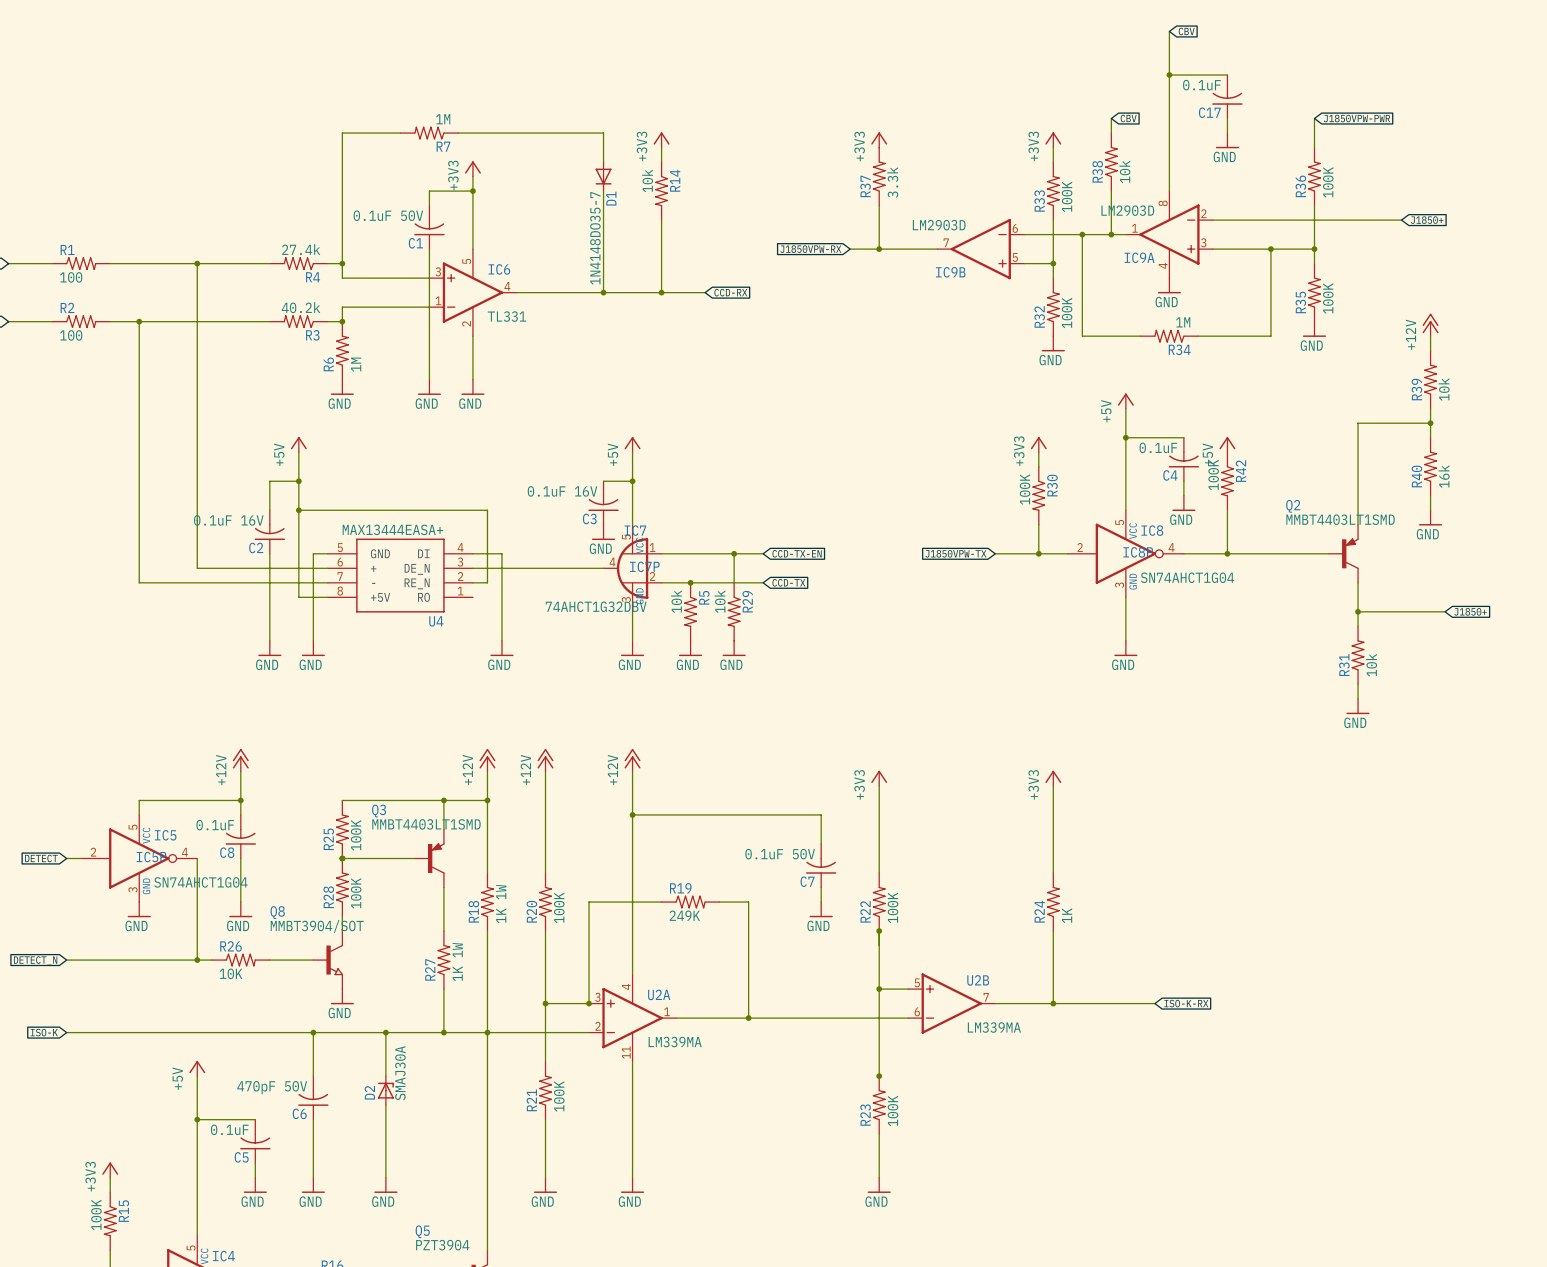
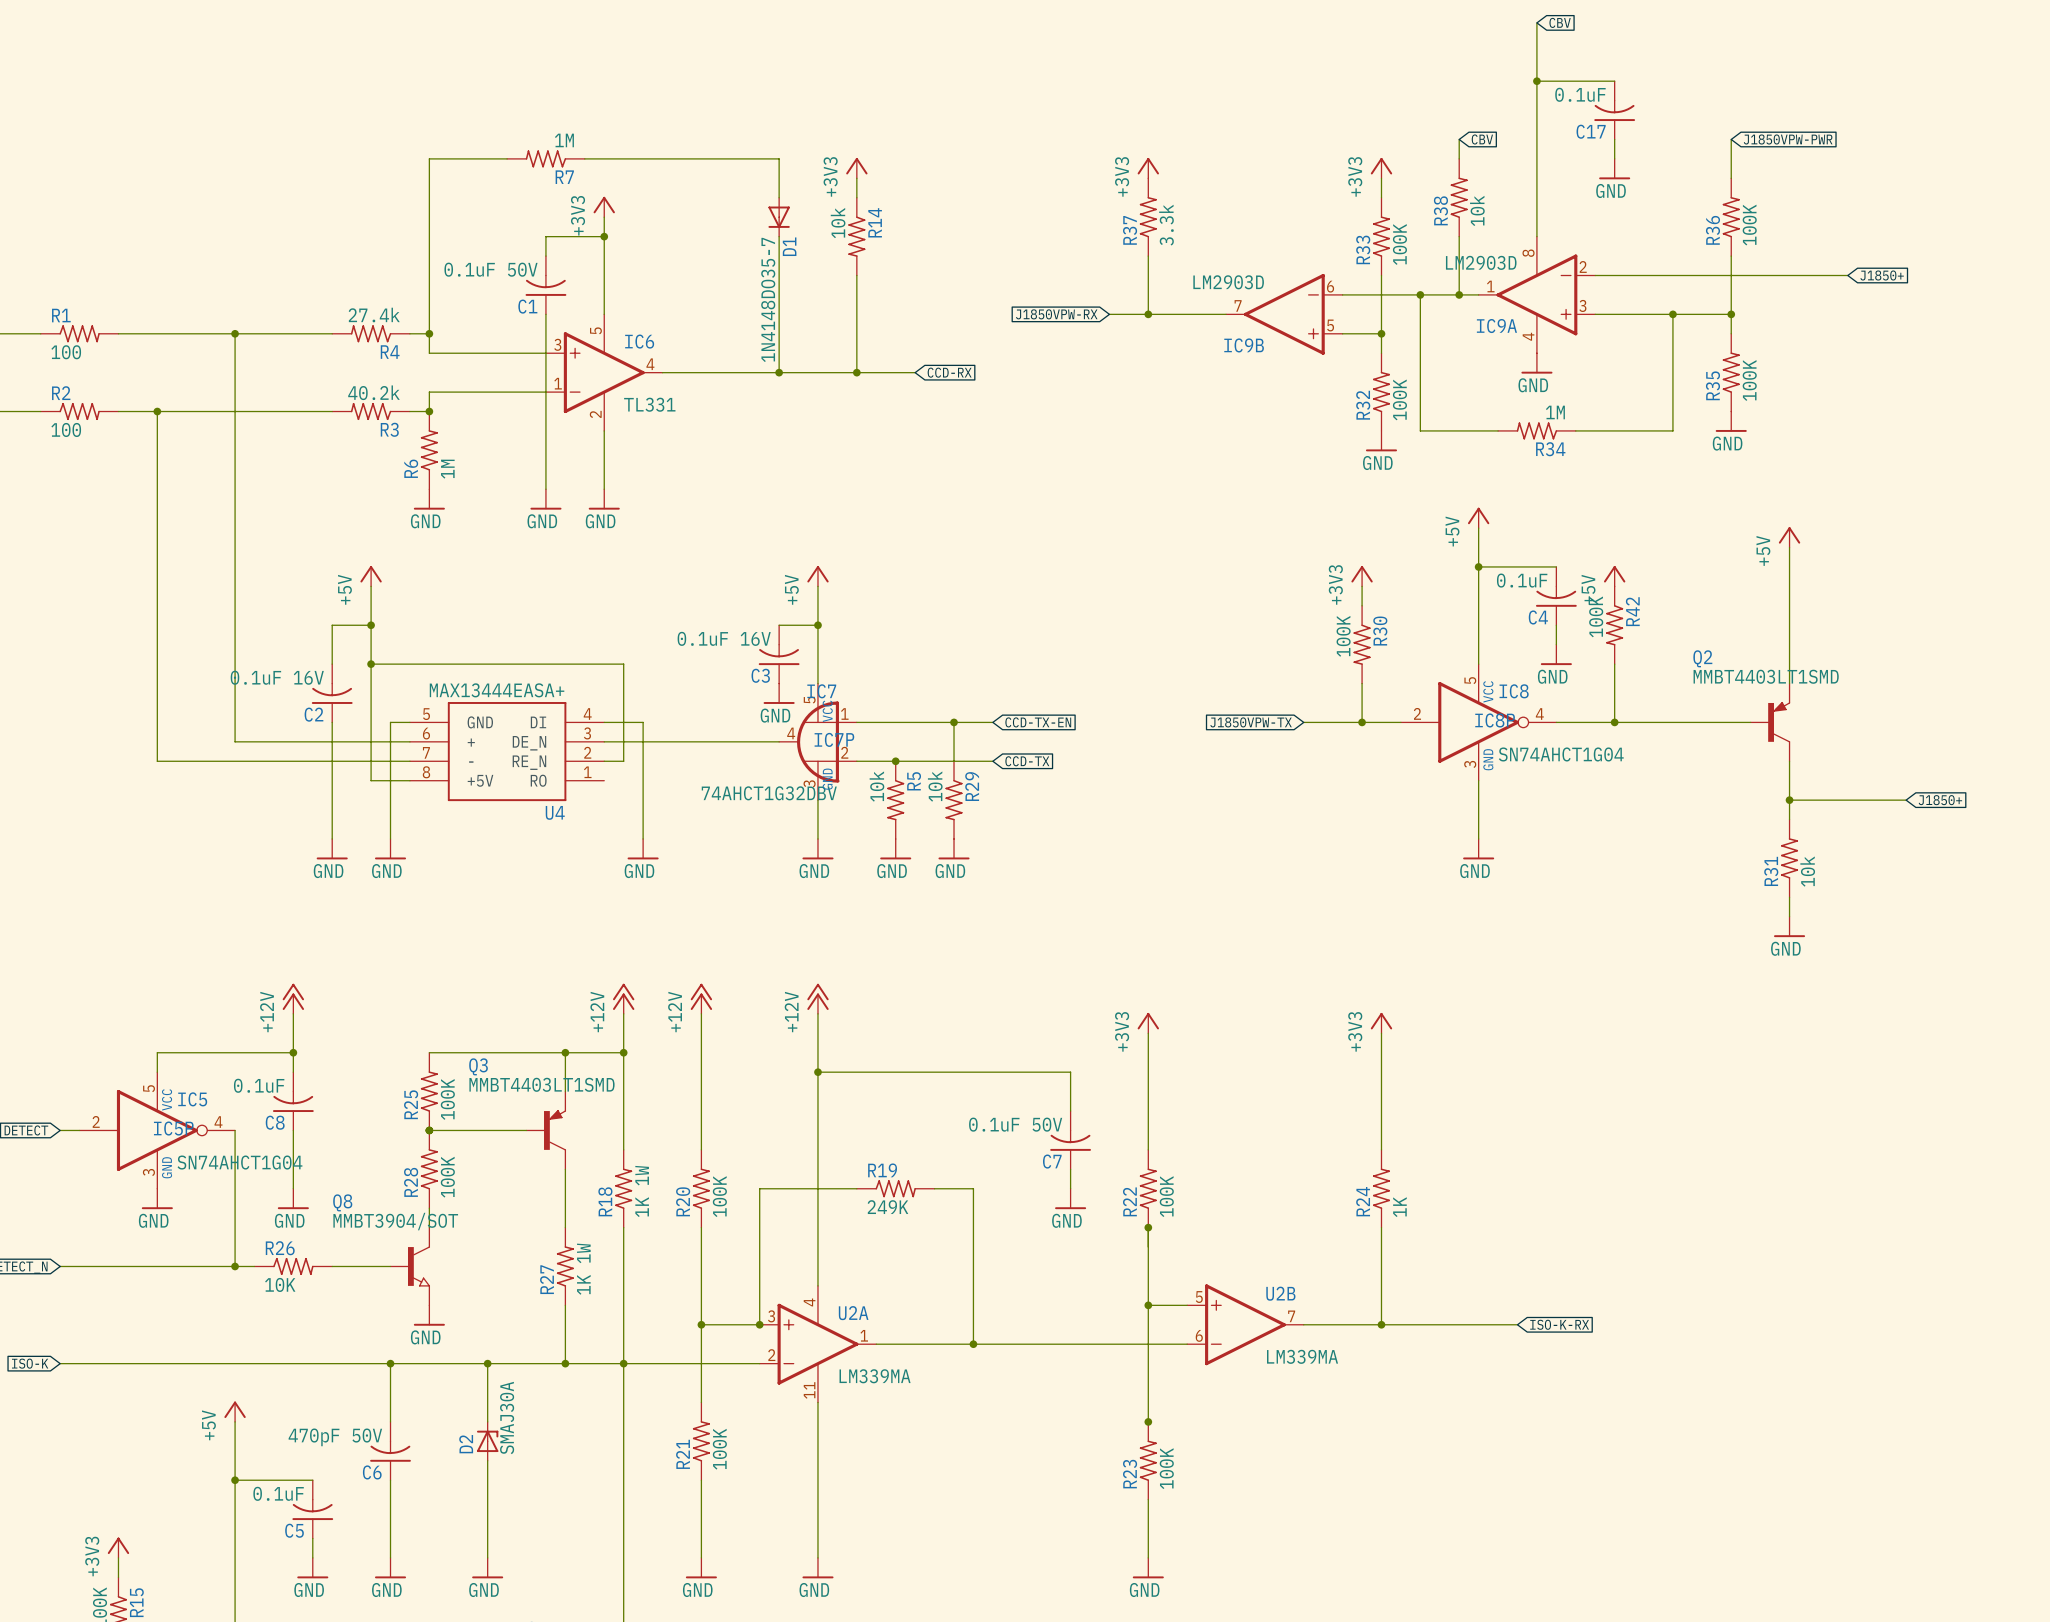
power symbol: +12V (1430, 324) -> none
wire: (1430, 336) (1430, 350) -> none
R39: 10k (1430, 379) -> none
wire: (1430, 408) (1430, 437) -> none
power symbol: none -> +5V (1789, 537)
wire: (1358, 423) (1430, 423) -> none
junction: (1430, 423) -> none
R40: 16k (1430, 466) -> none
wire: (1430, 495) (1430, 510) -> none
power symbol: GND (1430, 517) -> none

